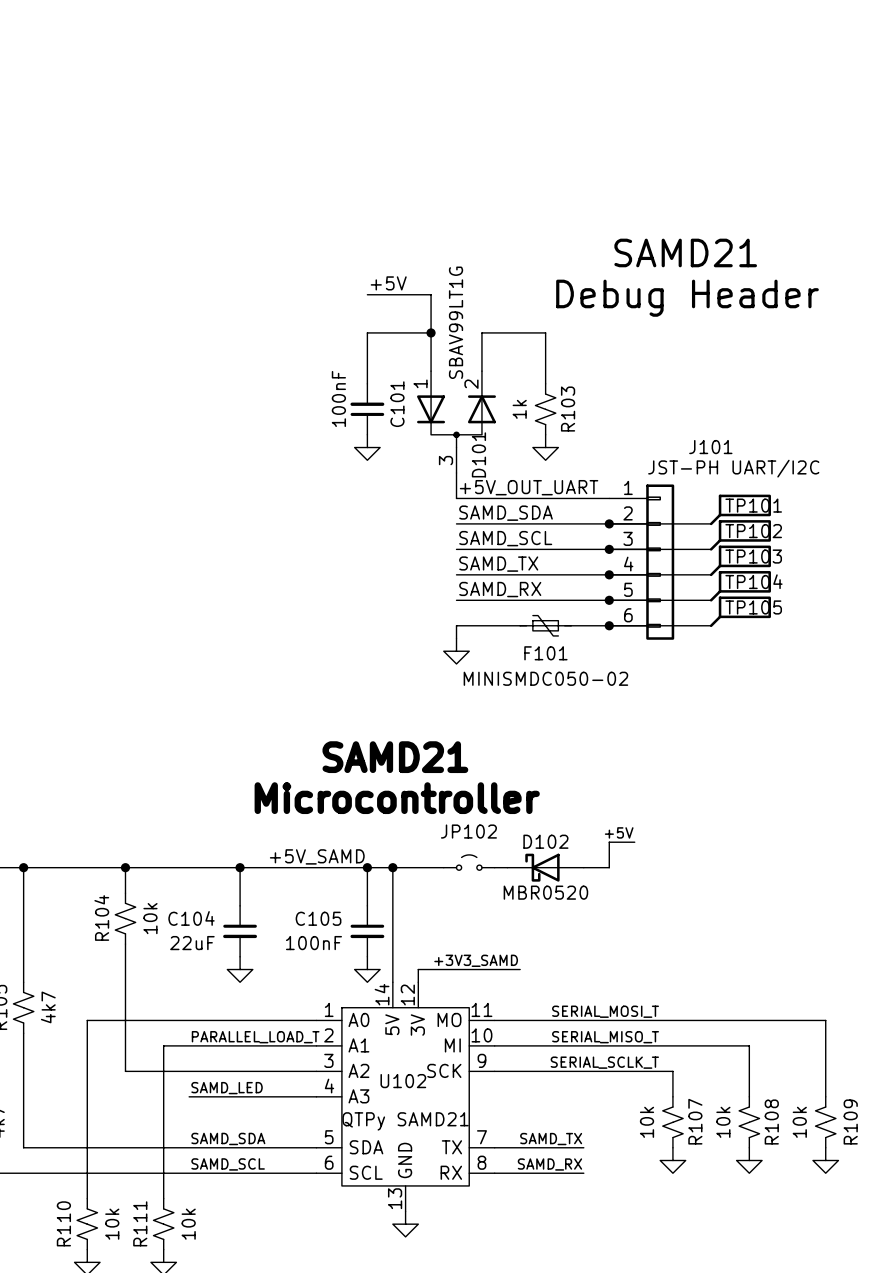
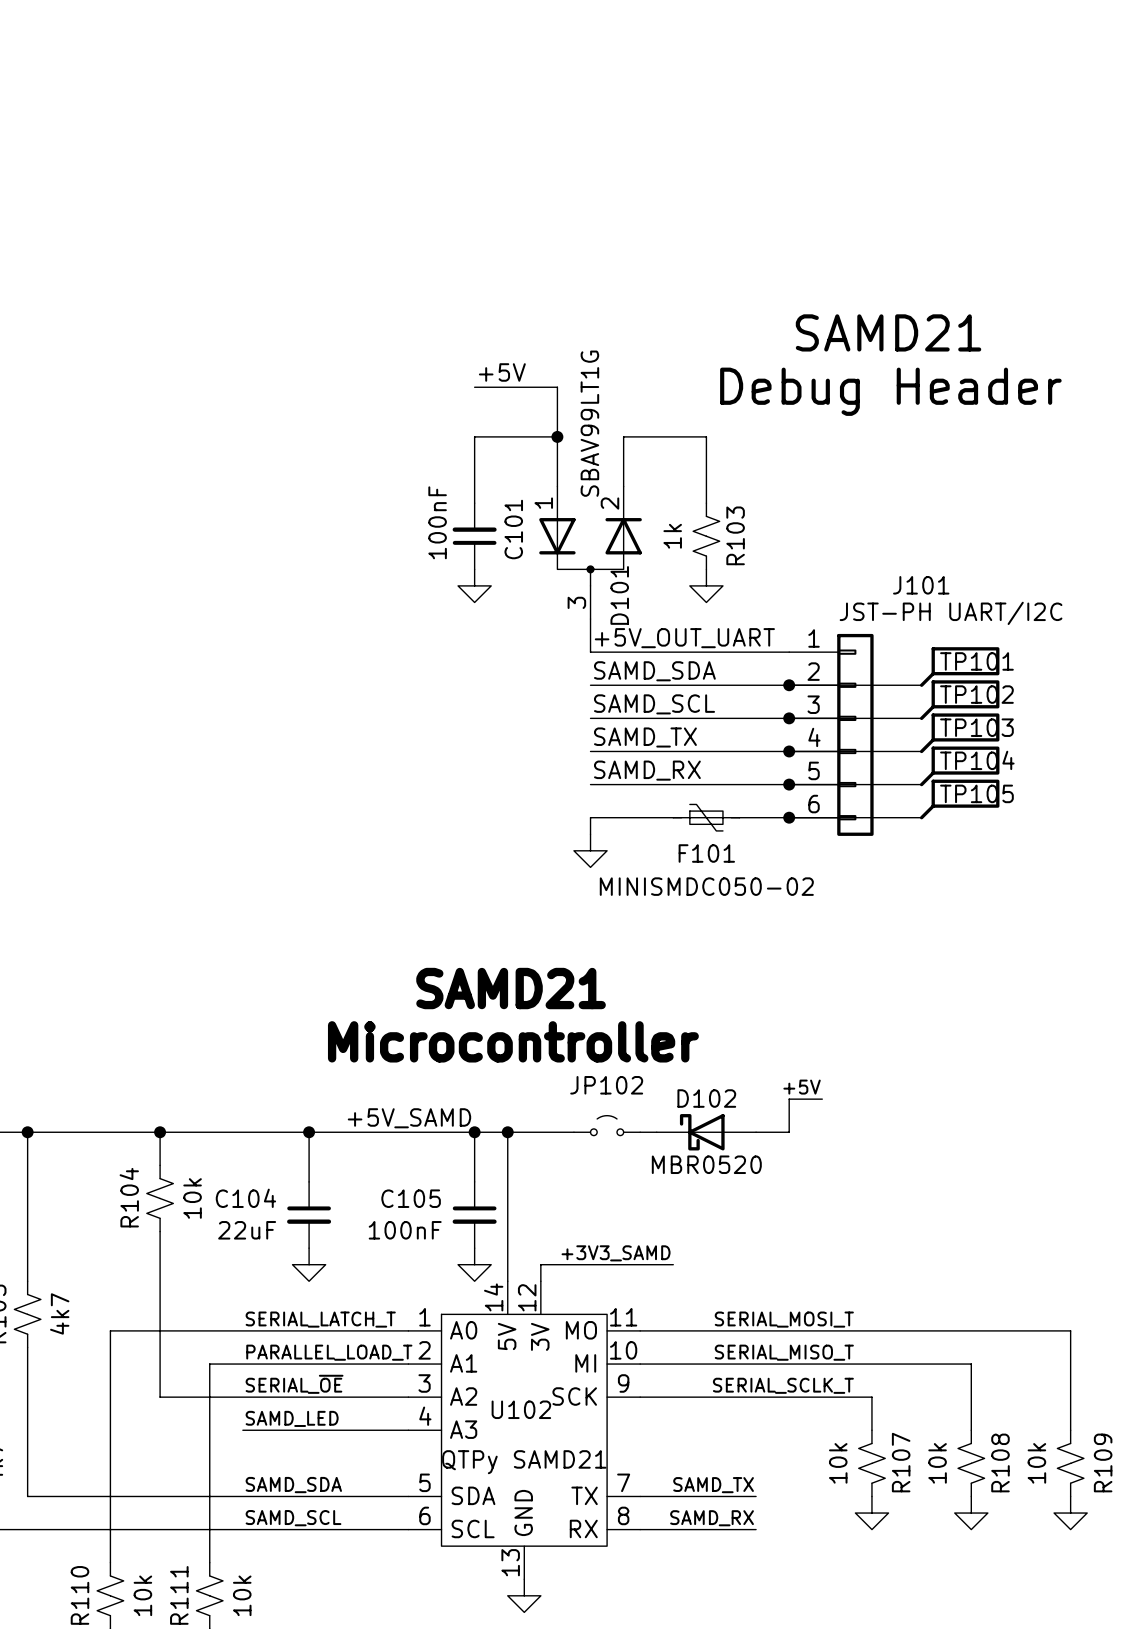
label: none -> SERIAL_LATCH_T (320, 1319)
label: none -> SERIAL_~{OE} (294, 1384)

